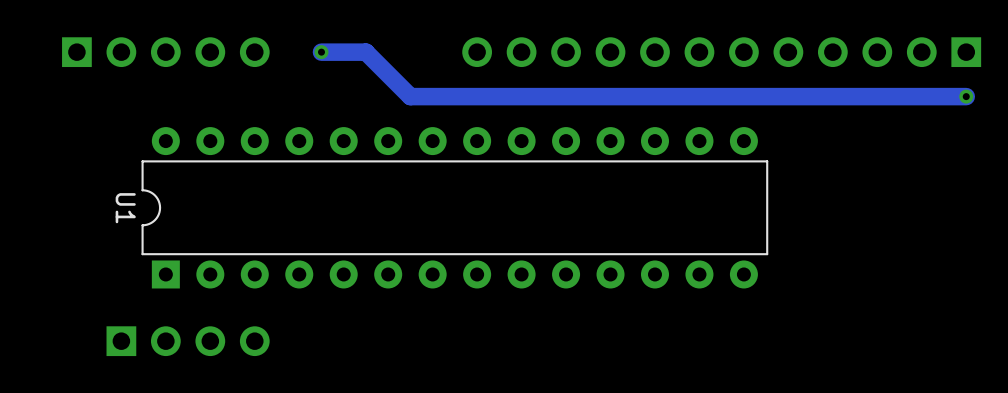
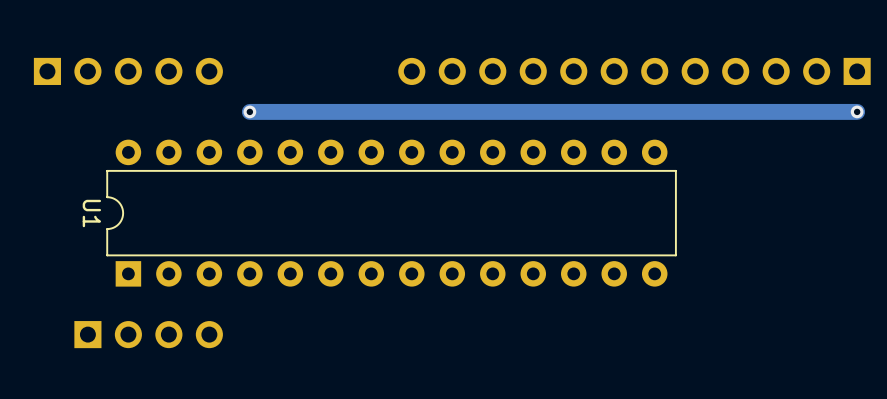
track: (321, 52) (365, 52) (410, 96) -> (249, 111) (351, 111)
via position: (321, 52) -> (249, 111)

